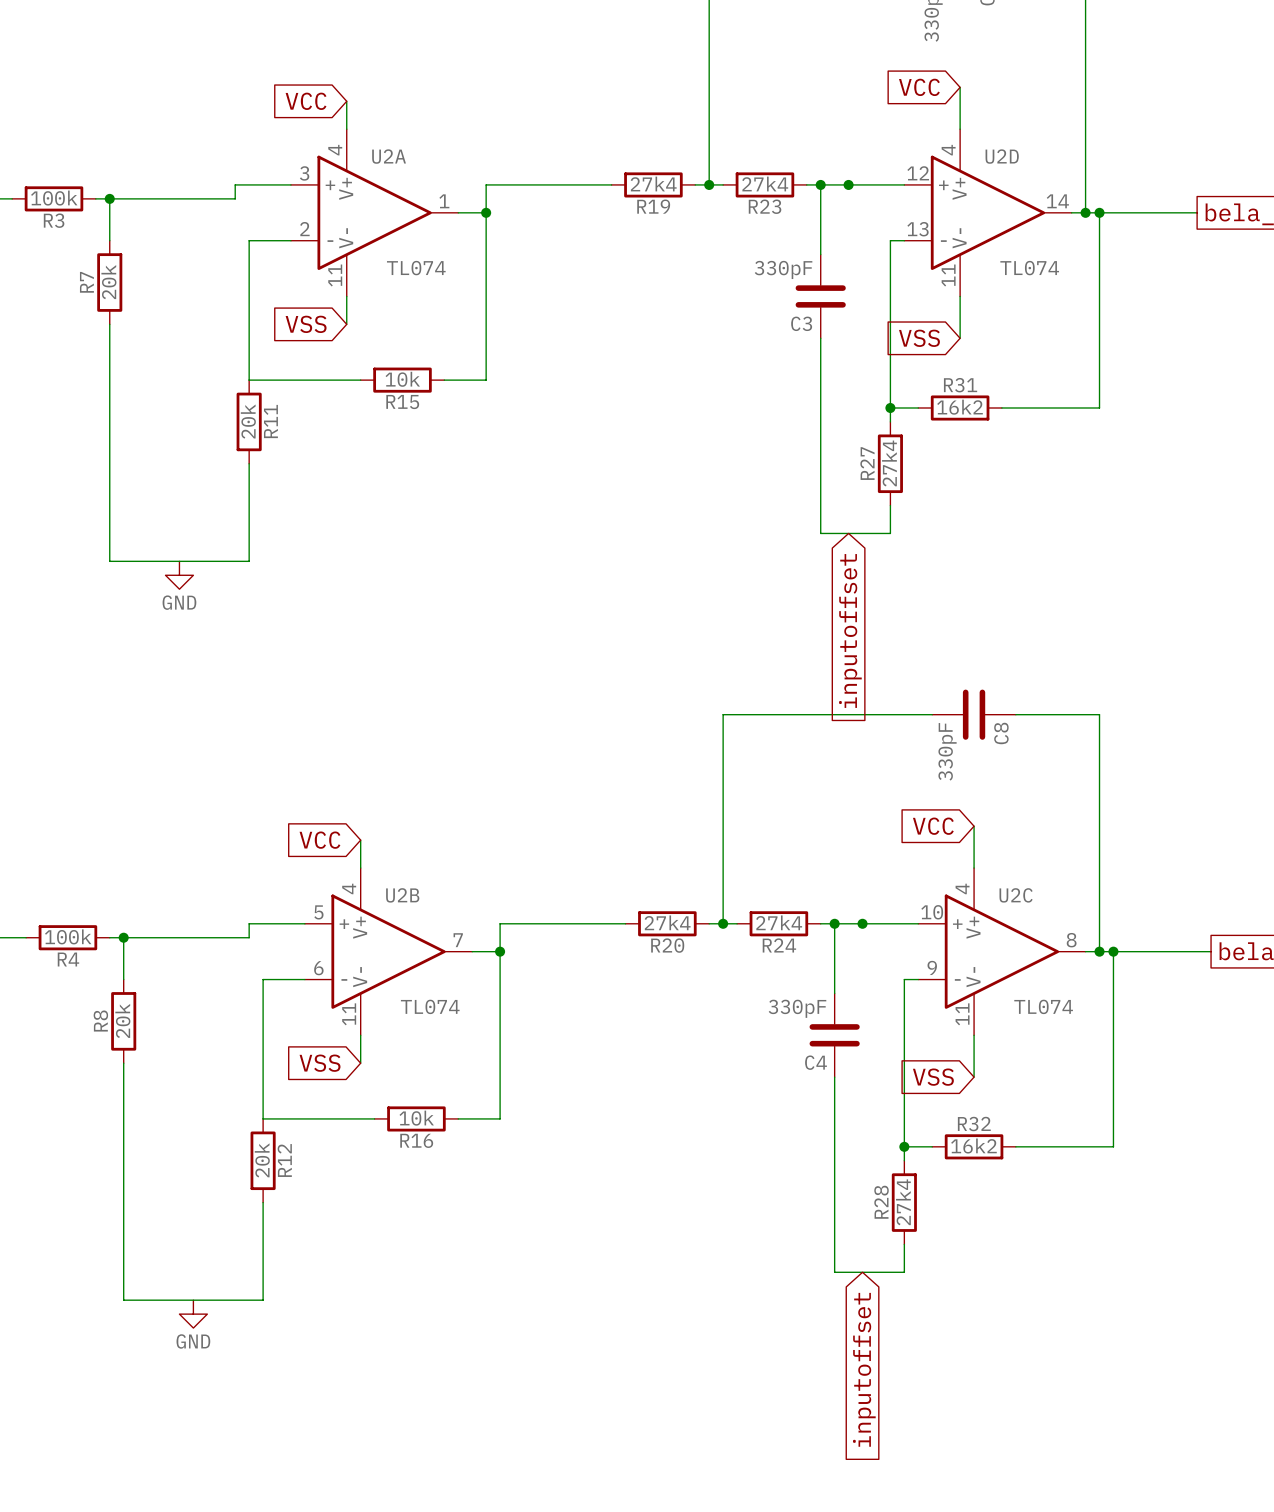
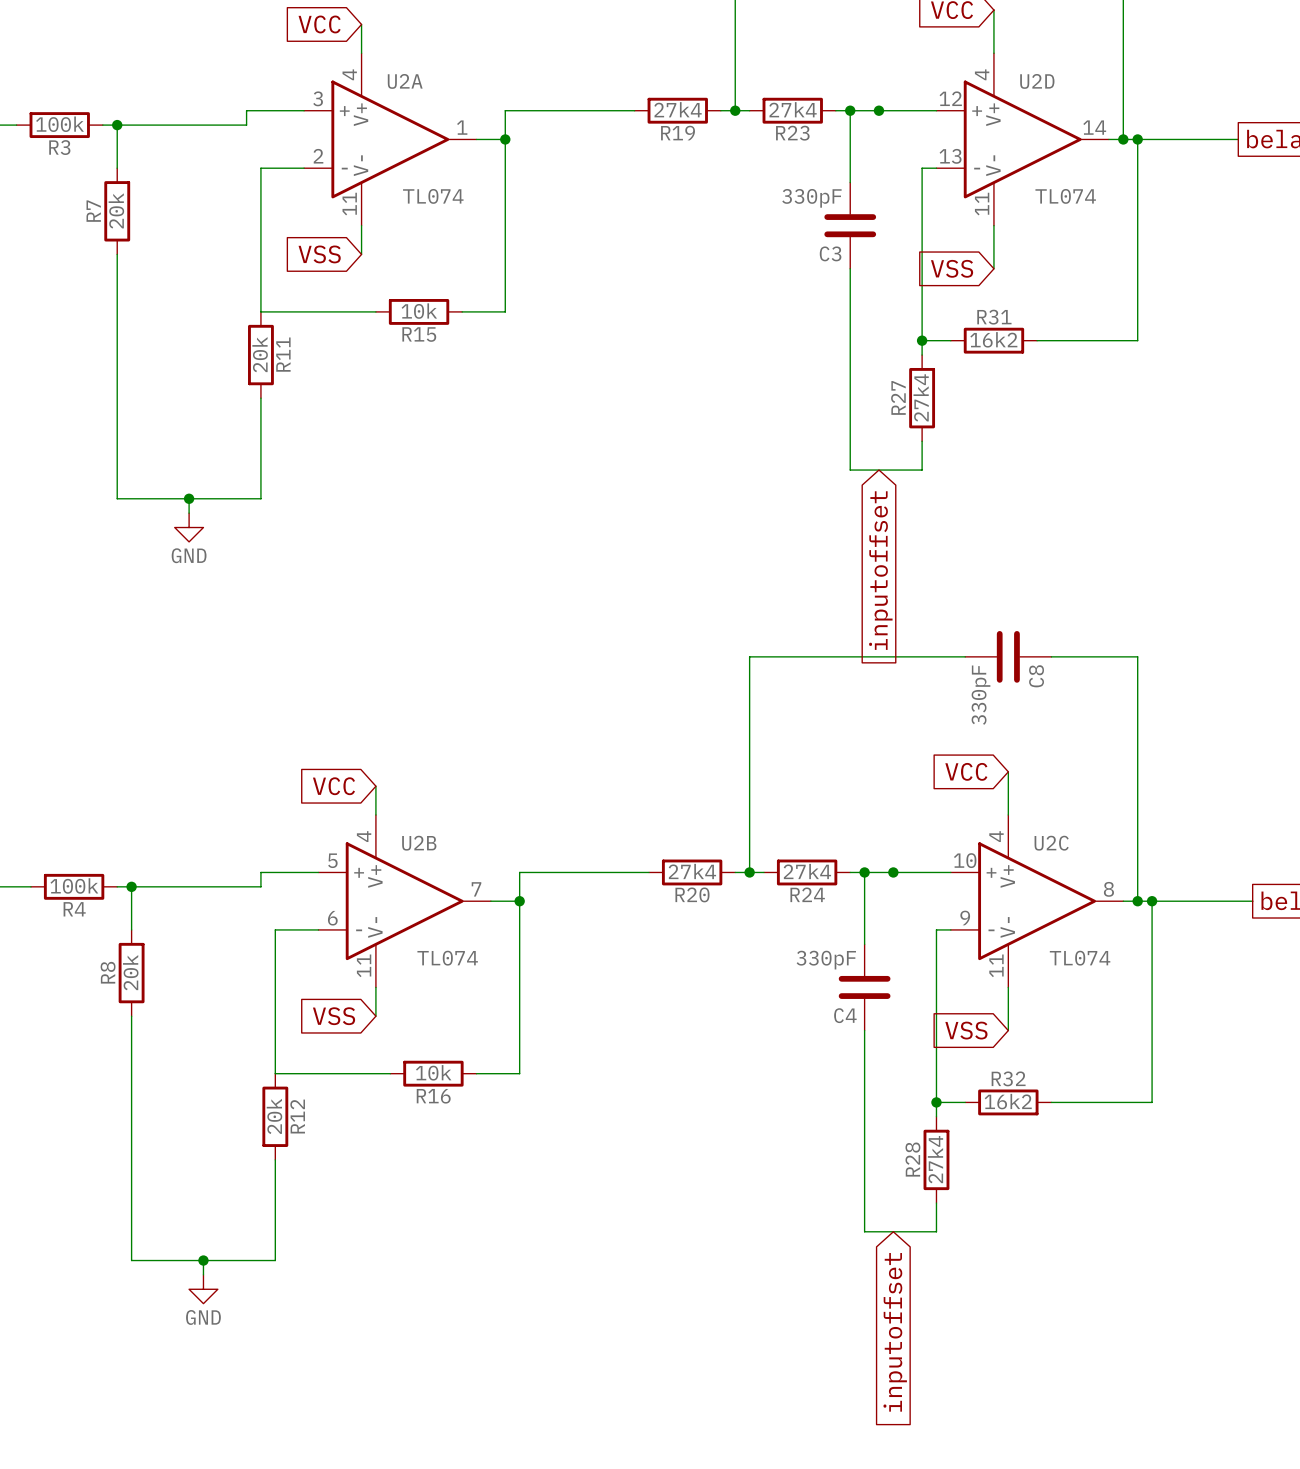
junction: none -> (189, 498)
power symbol position: GND (179, 575) -> GND (189, 527)
junction: none -> (203, 1260)
power symbol position: GND (193, 1314) -> GND (203, 1289)

